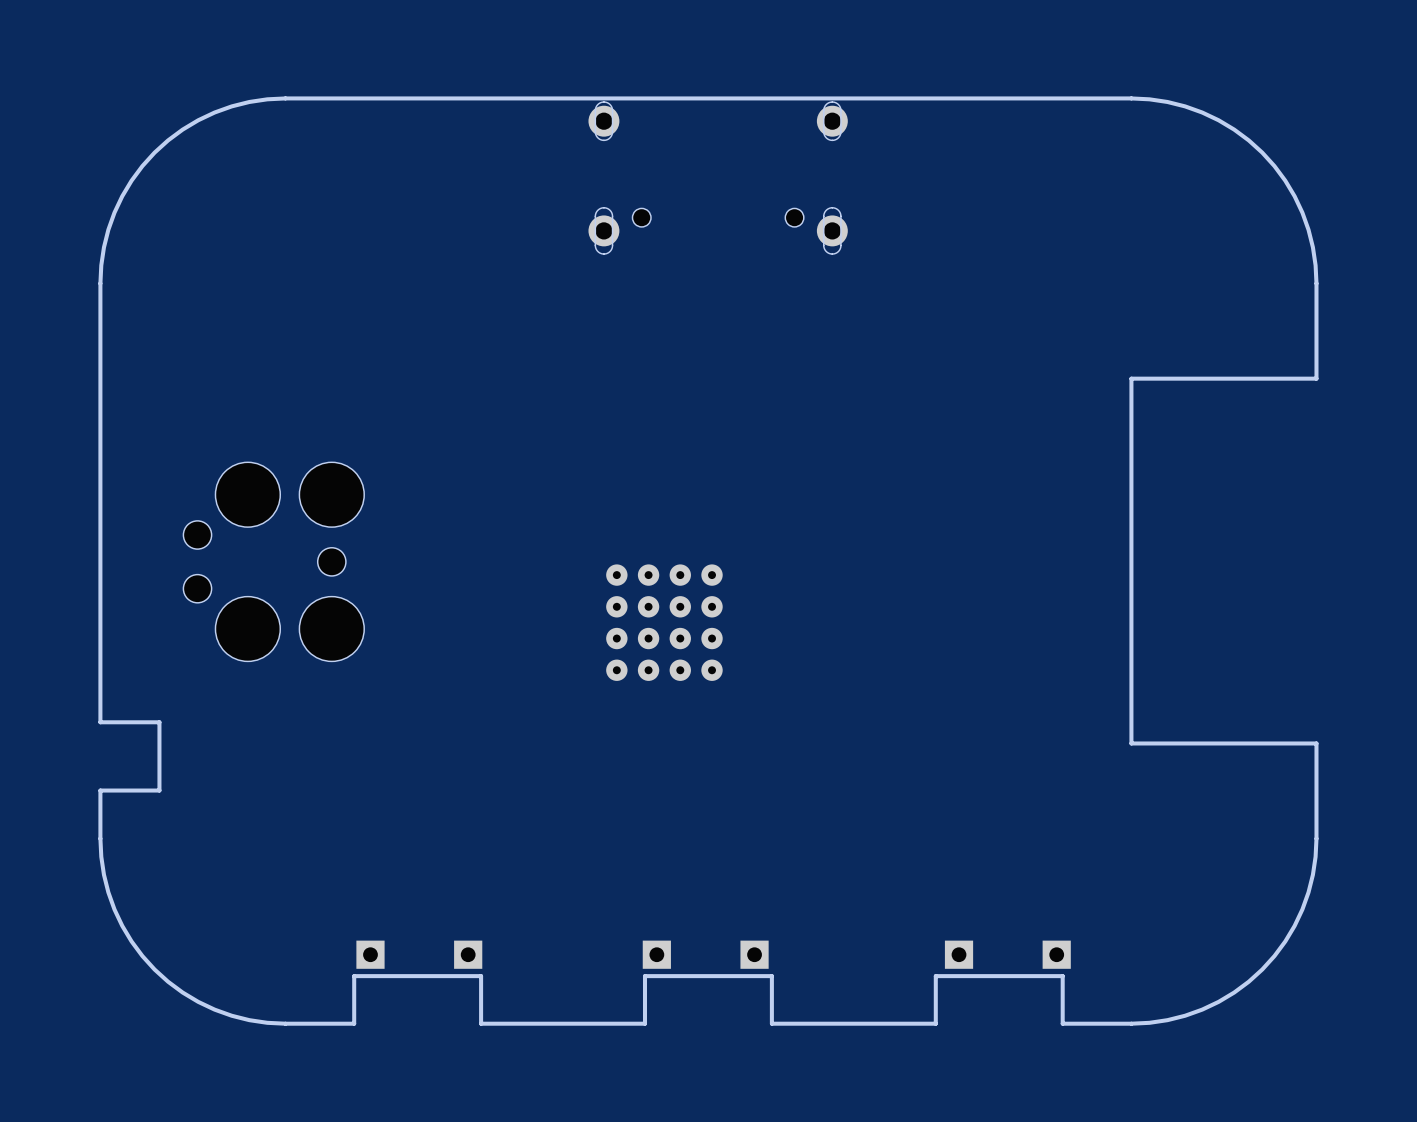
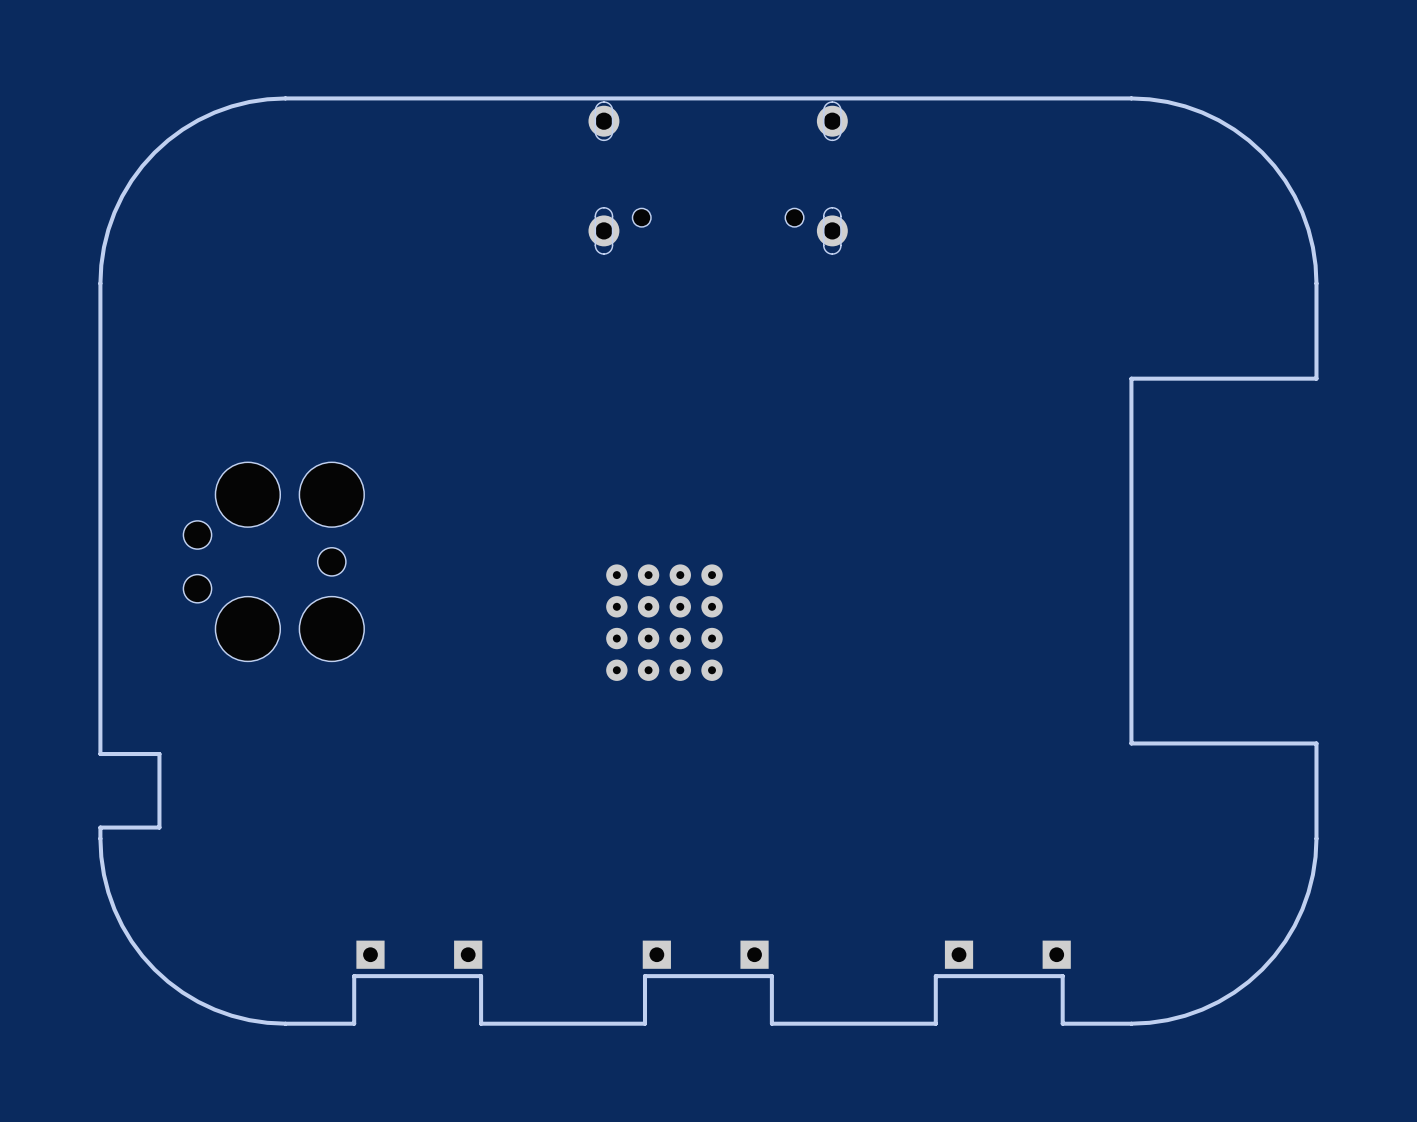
board edge: (100, 722) (159, 722) (159, 754) -> (100, 722) (100, 754) (159, 754)
board edge: (159, 790) (100, 790) (100, 827) -> (159, 790) (159, 827) (100, 827)

